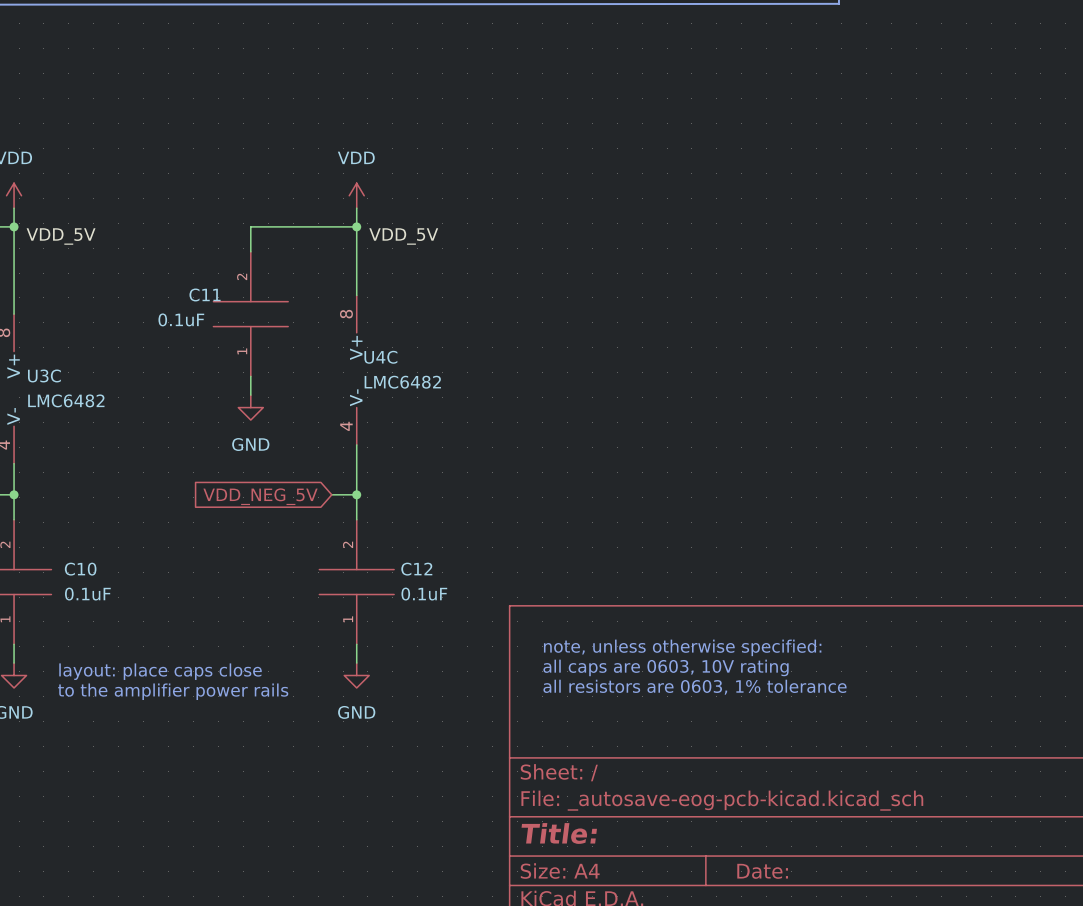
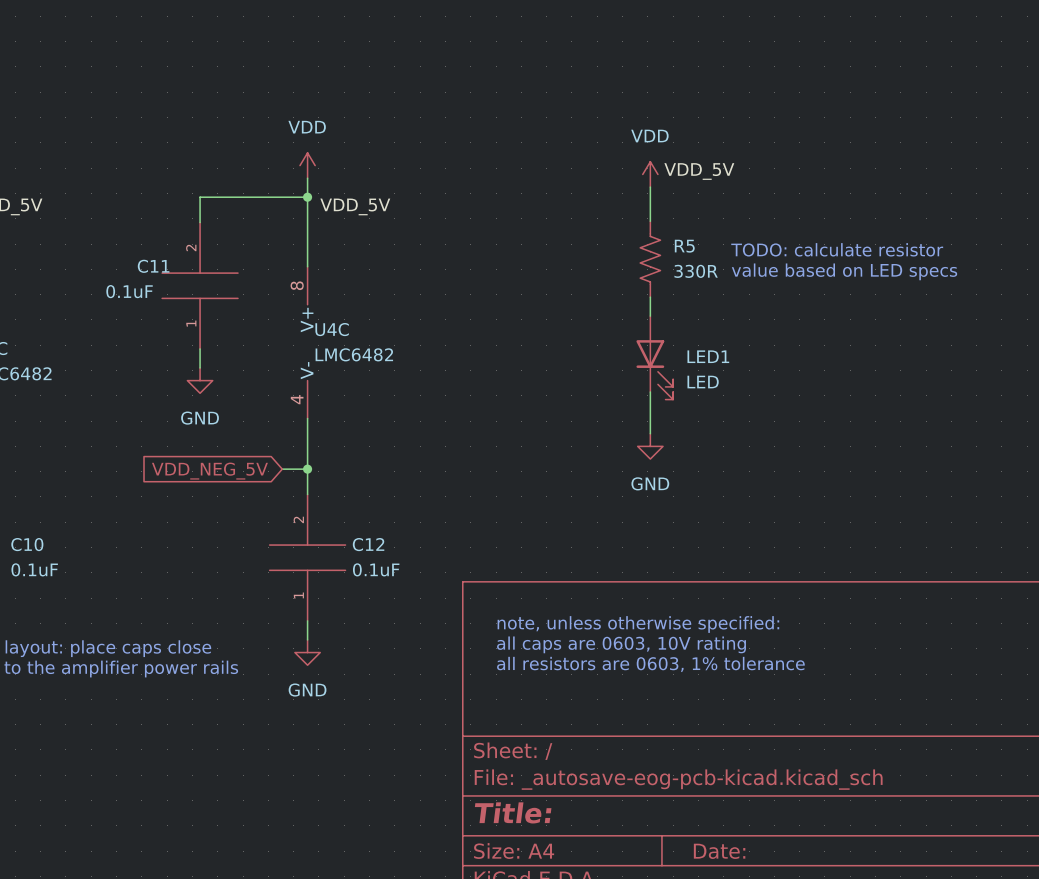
label: none -> VDD_5V (699, 171)
power symbol: none -> VDD (650, 174)
wire: none -> (650, 187) (650, 221)
text: none -> TODO: calculate resistor (837, 249)
R5: none -> 330R (650, 259)
text: none -> value based on LED specs (844, 271)
wire: none -> (650, 297) (650, 316)
LED1: none -> LED (654, 357)
wire: none -> (650, 391) (650, 433)
power symbol: none -> GND (650, 446)

